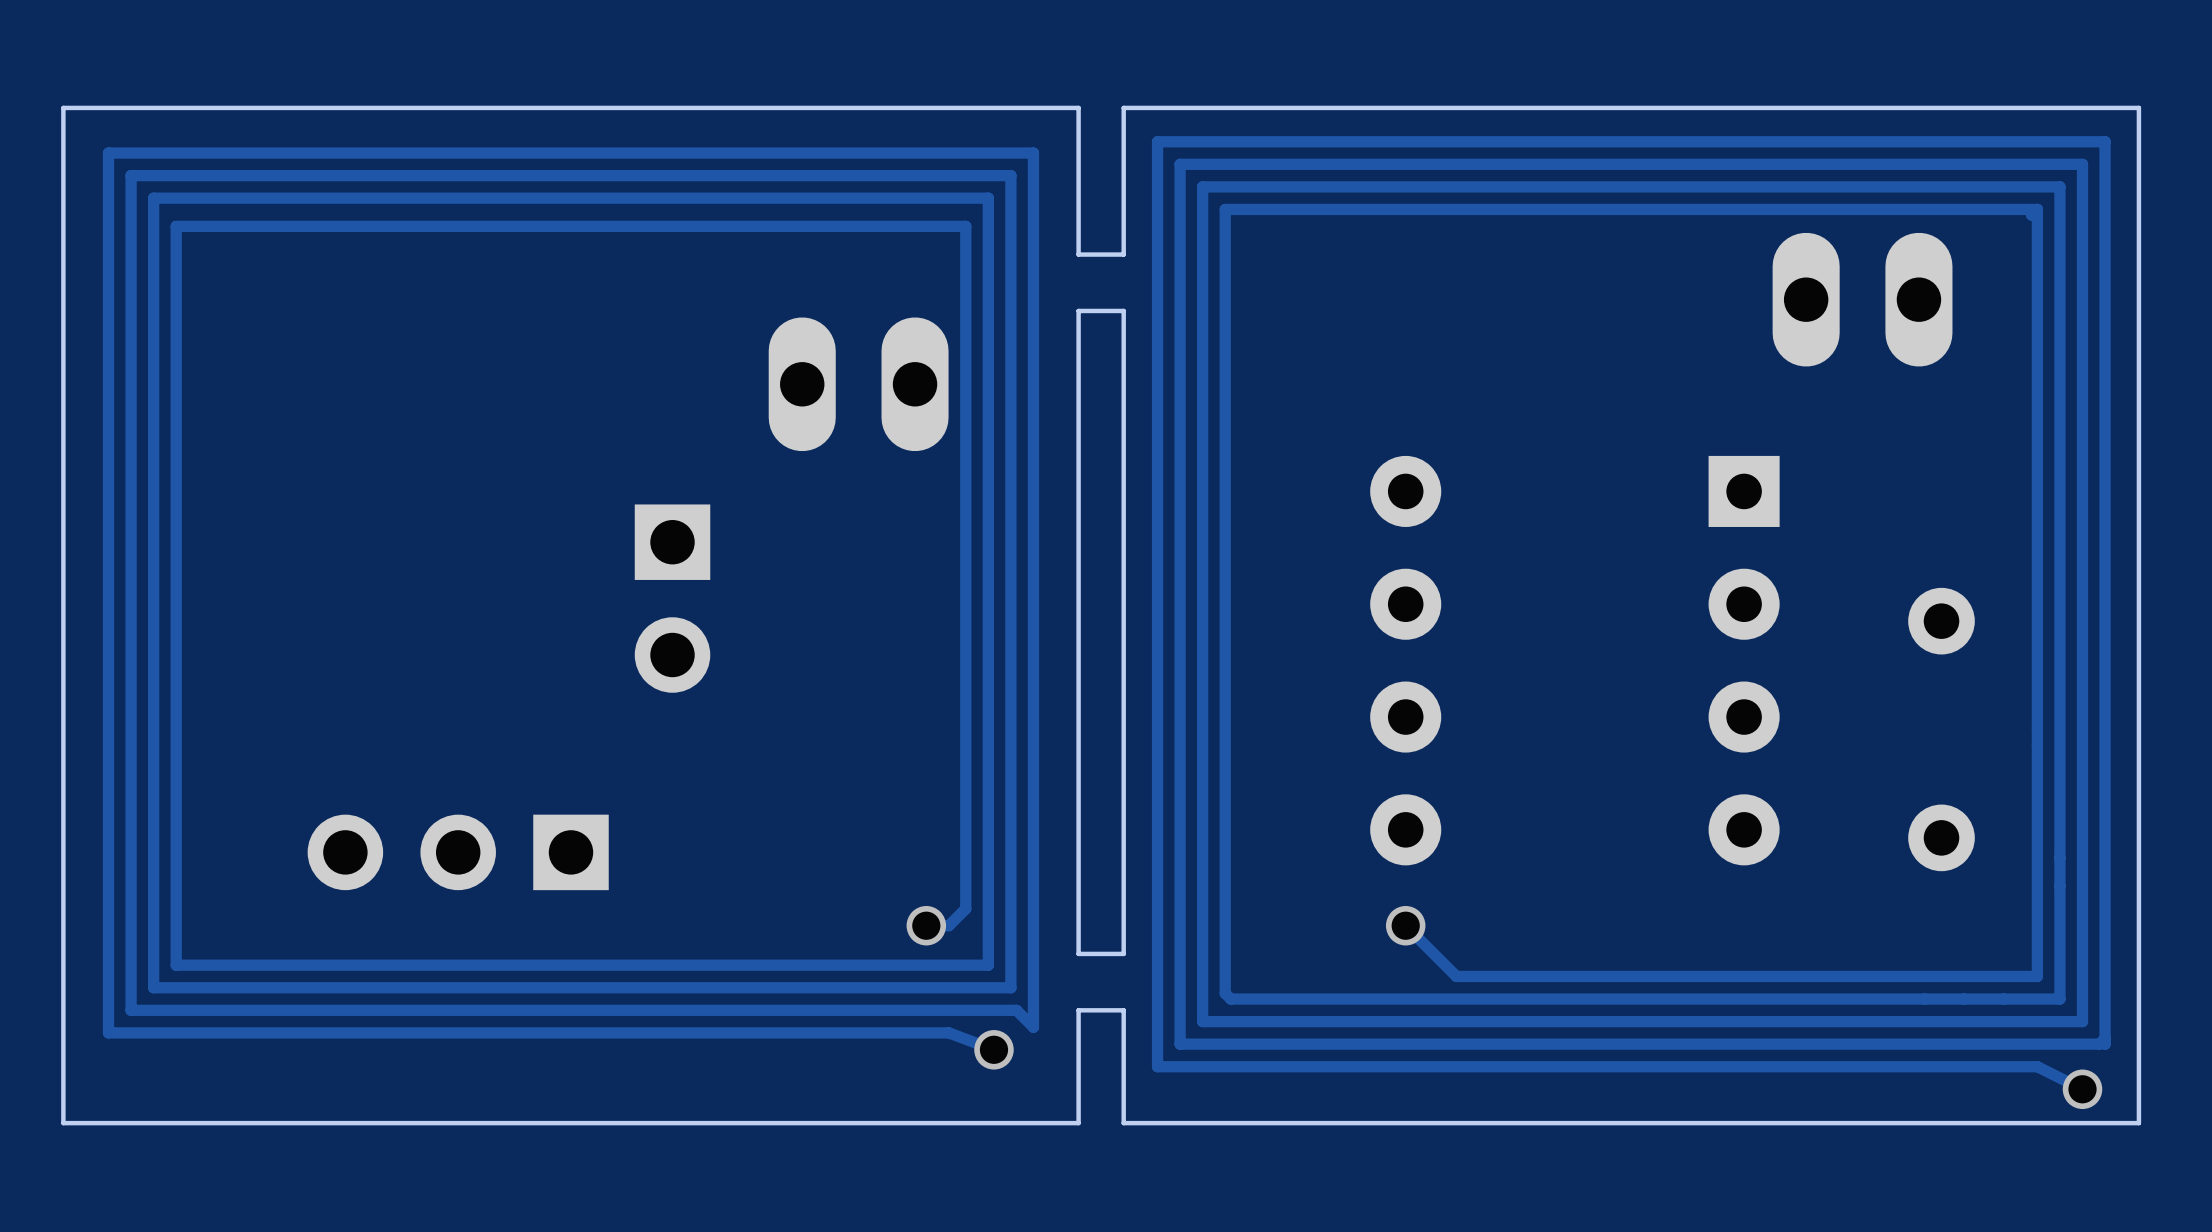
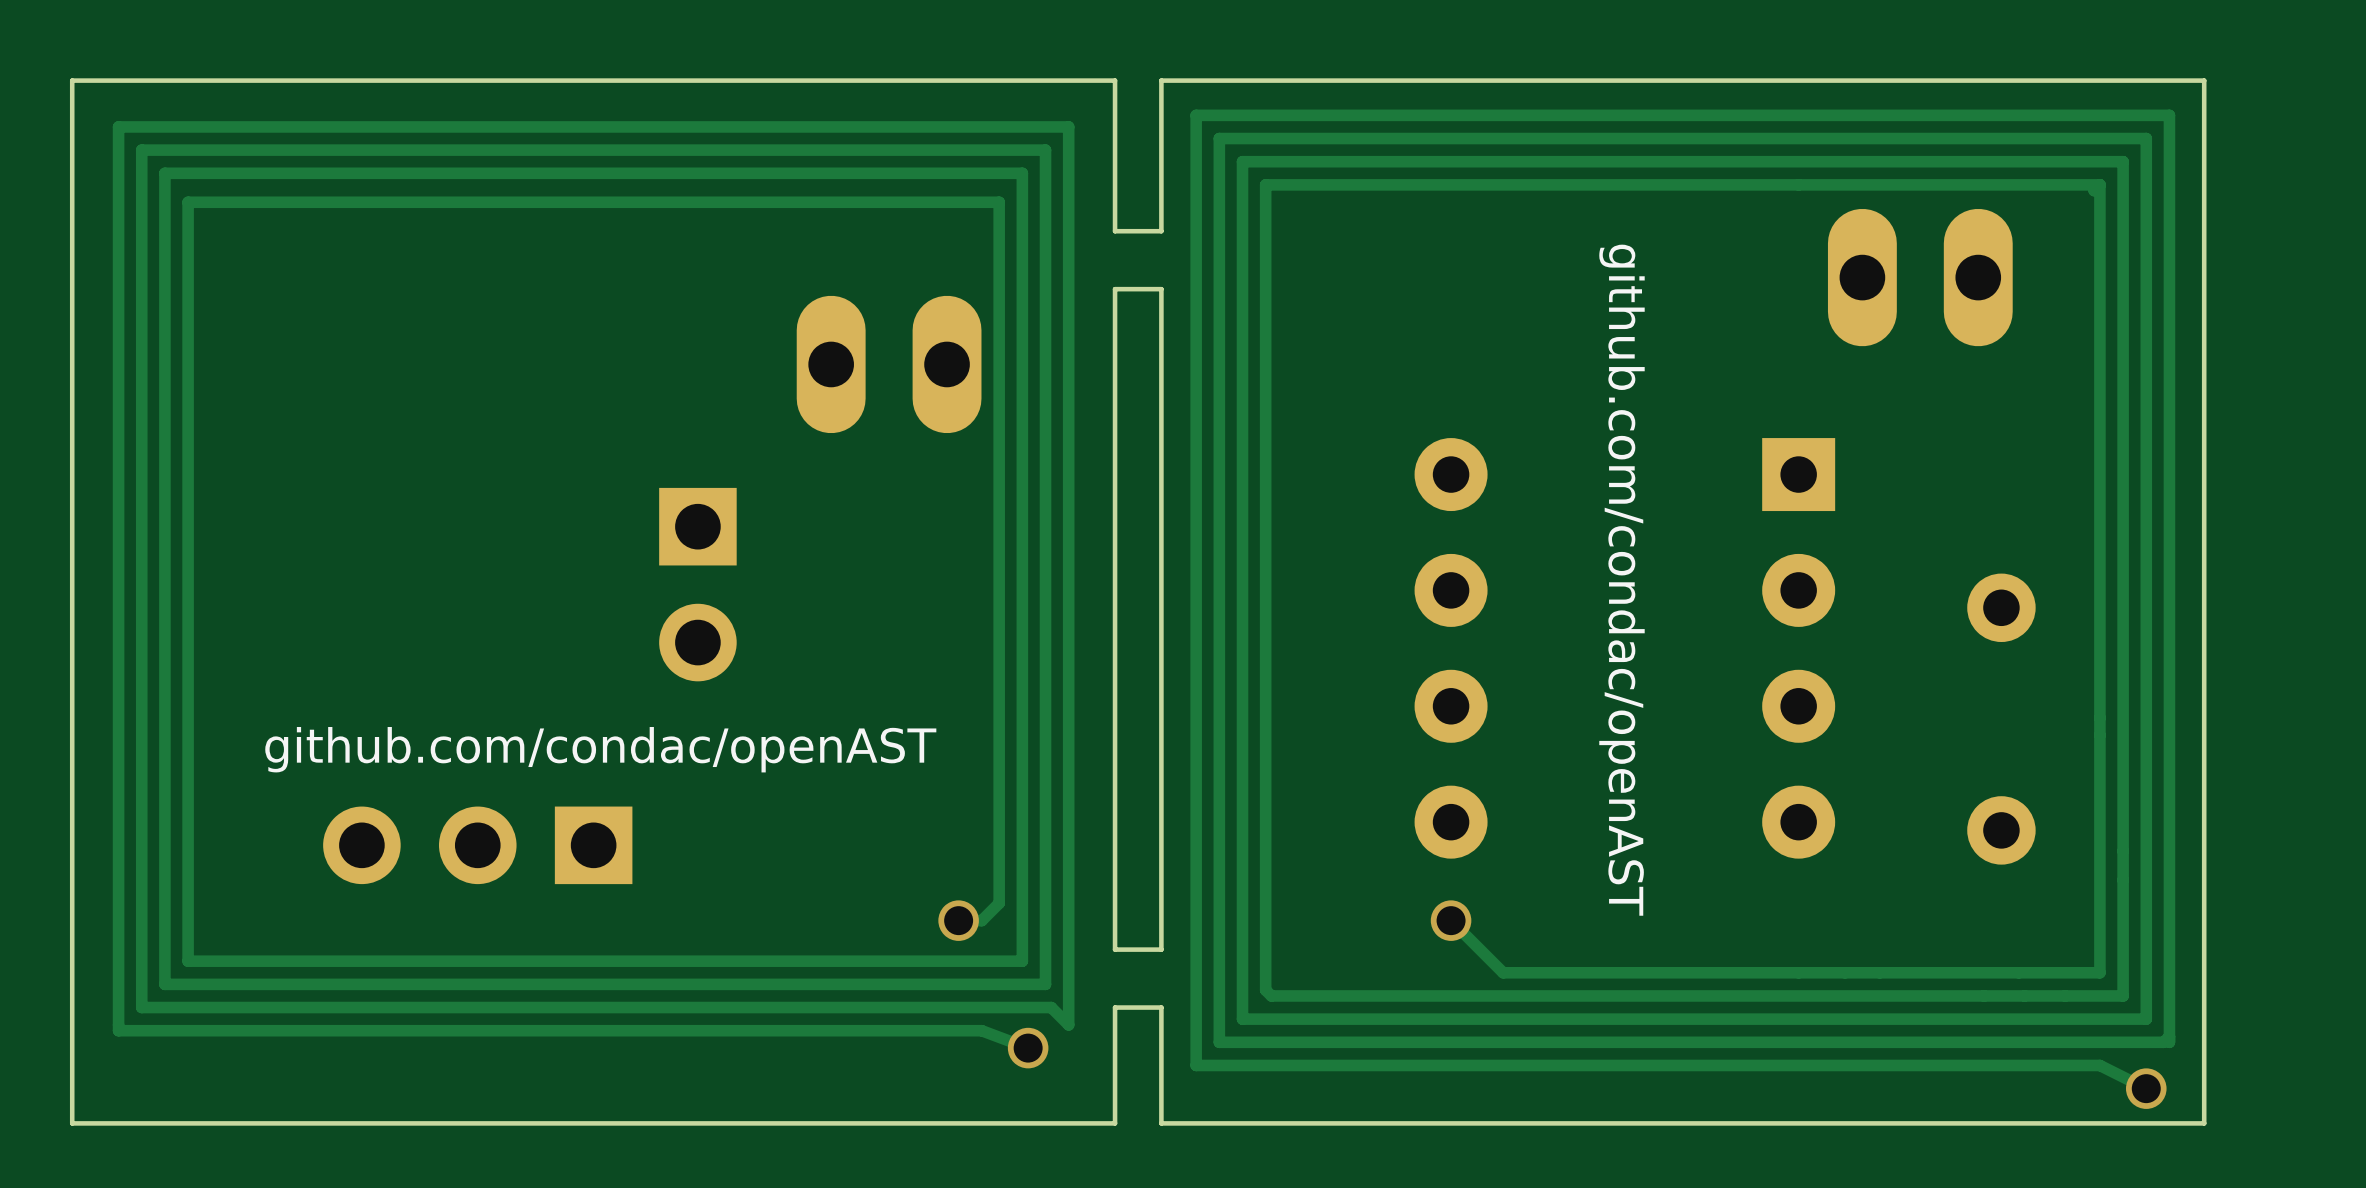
text: none -> github.com/condac/openAST (1621, 580)
text: none -> github.com/condac/openAST (600, 749)

